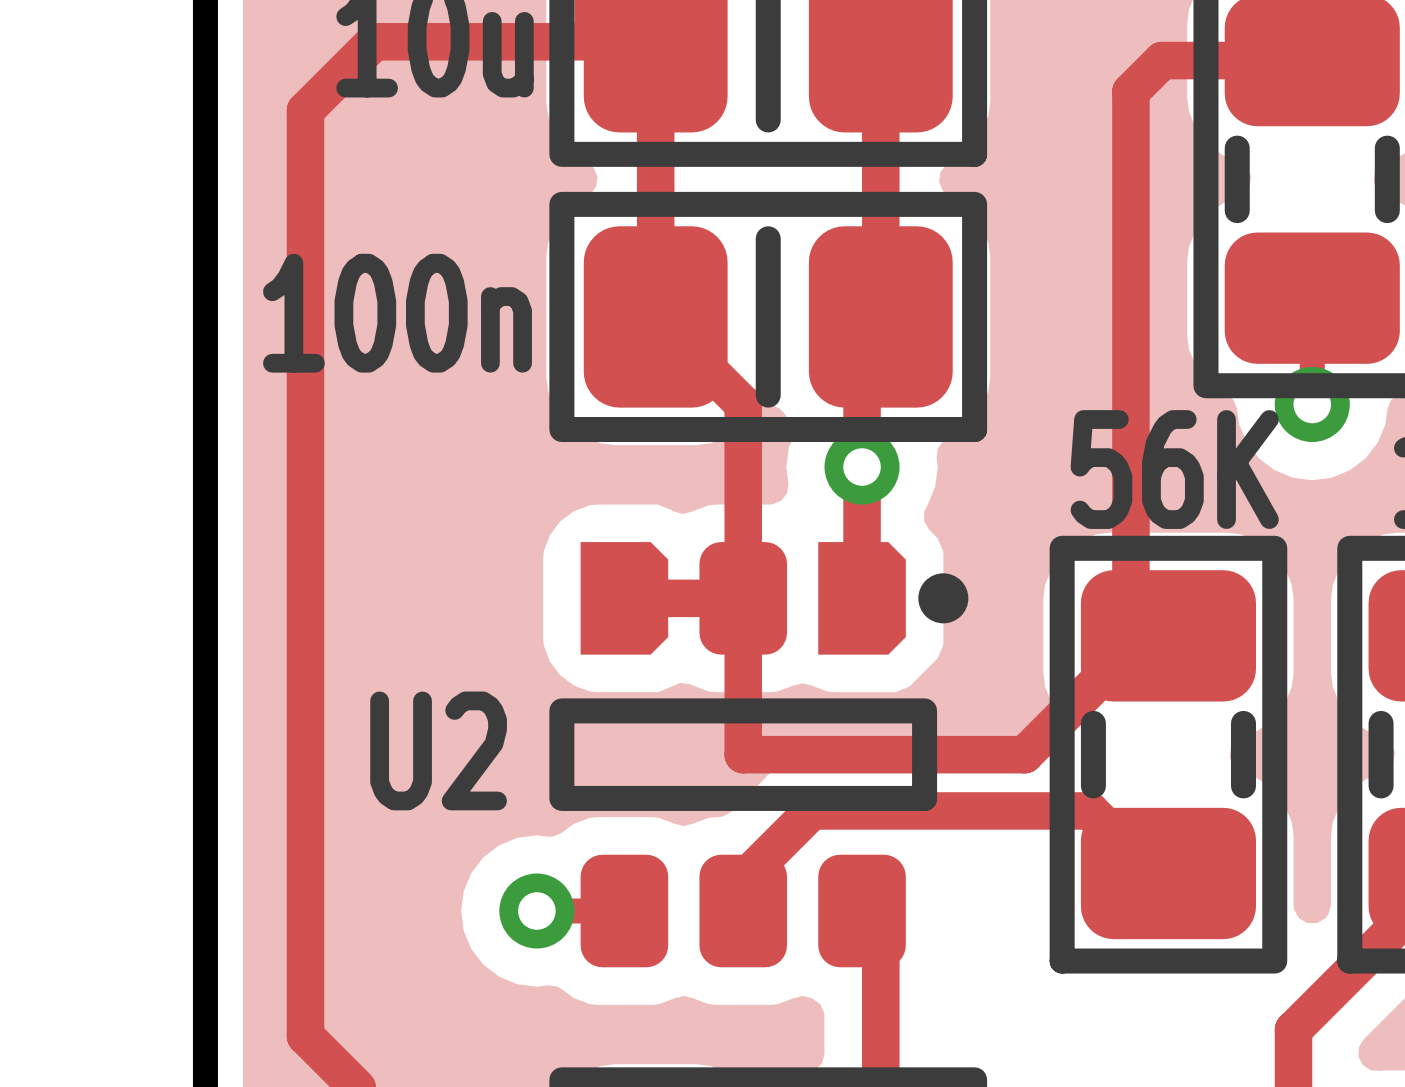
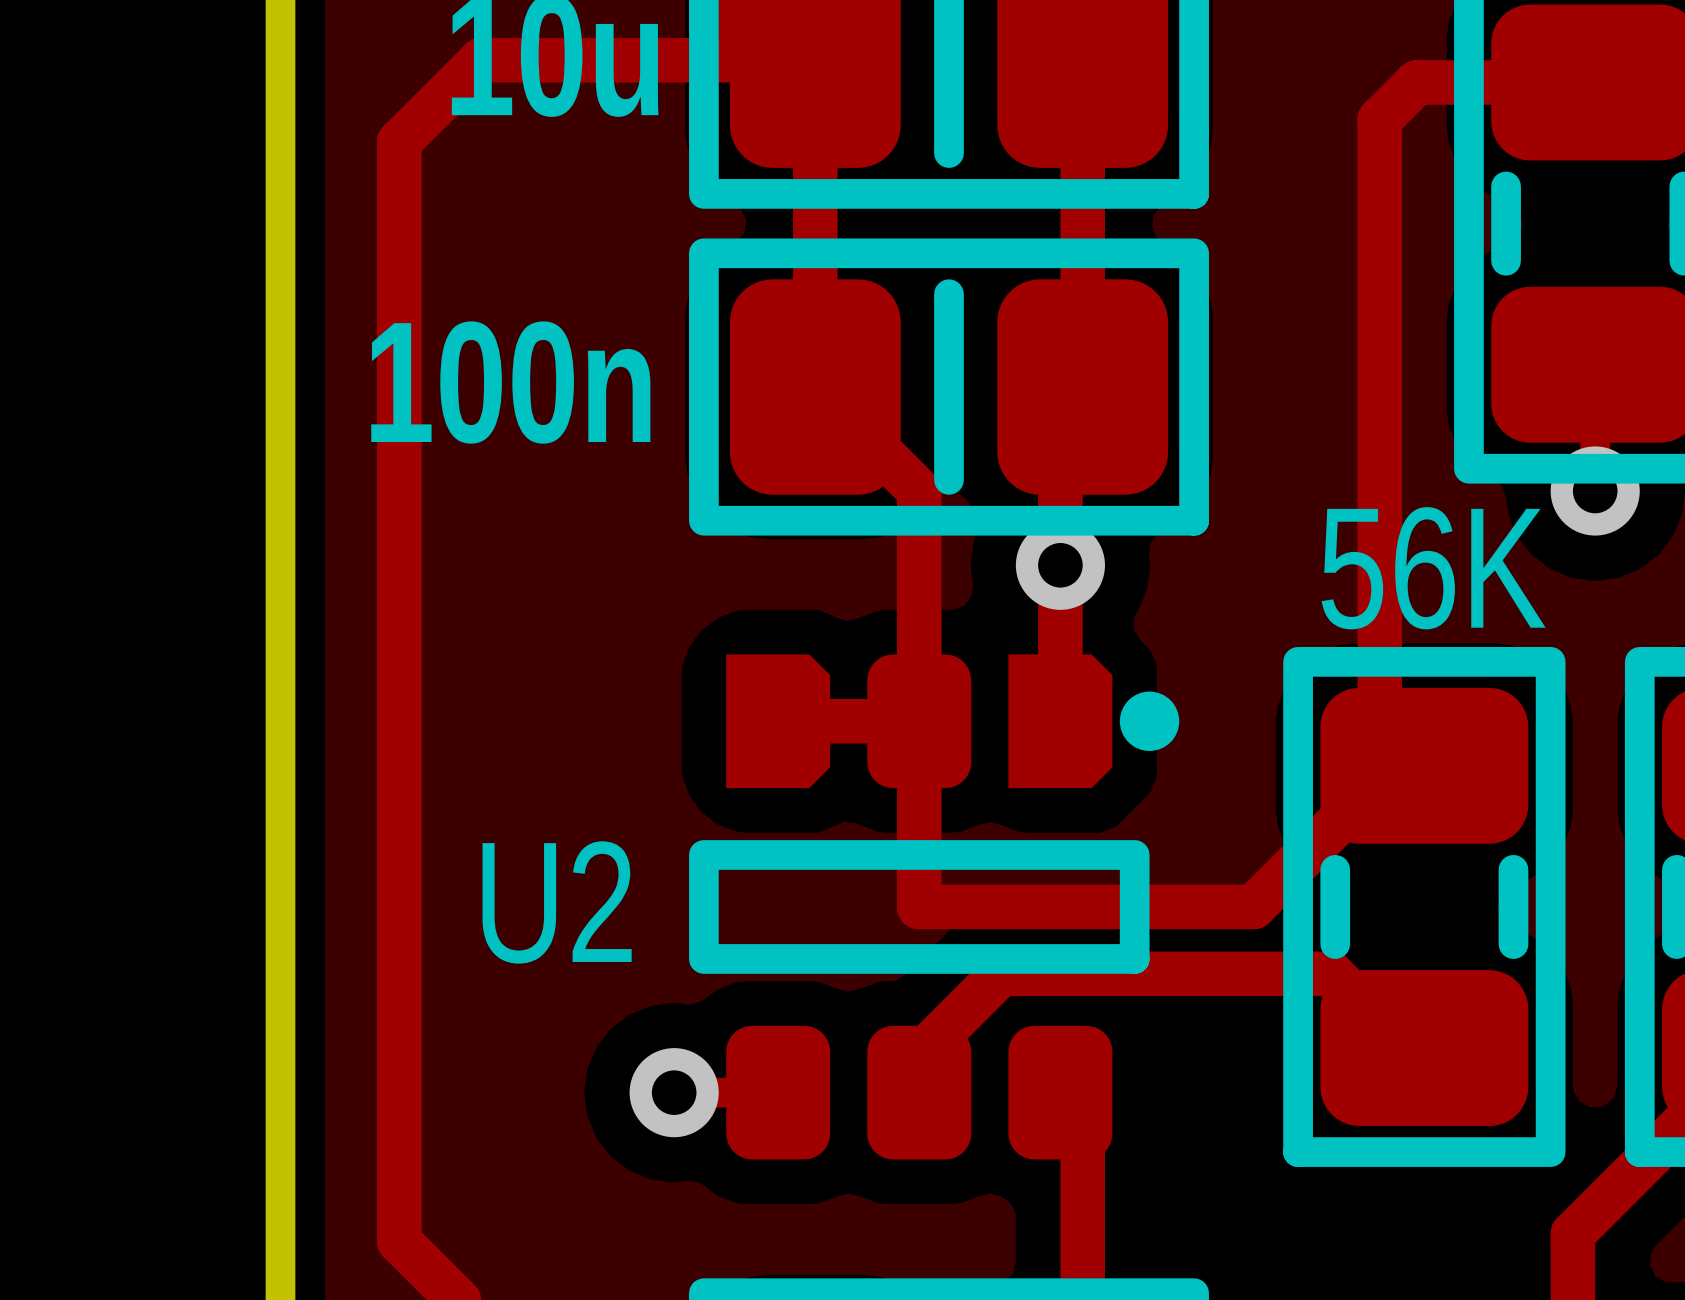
U2 footprint: [549, 542, 969, 968] -> [689, 654, 1180, 1160]

